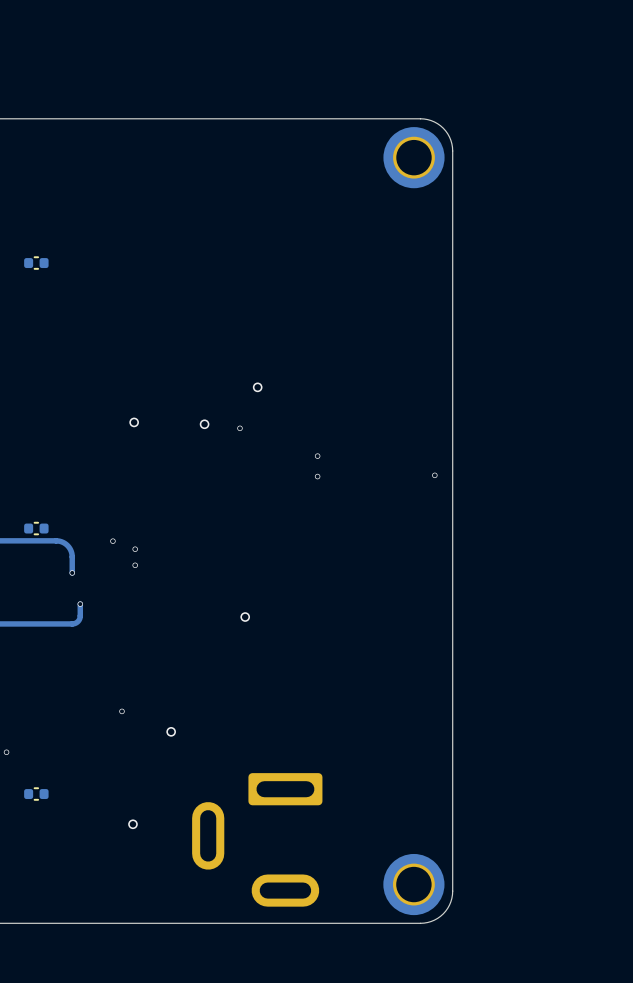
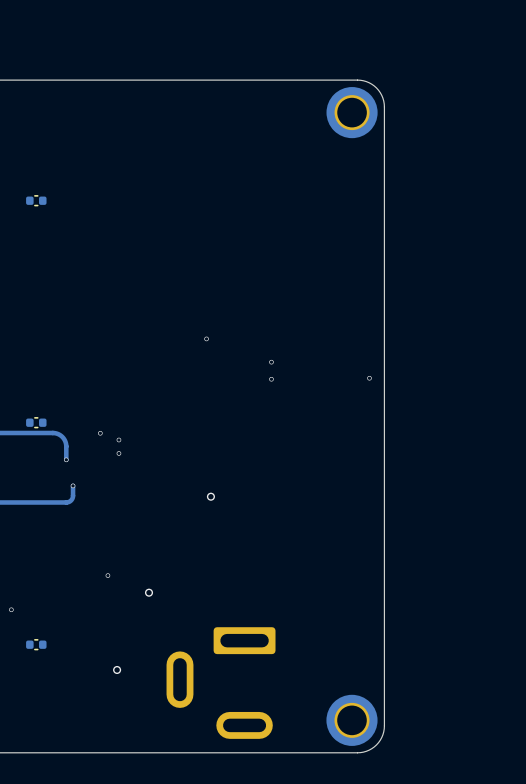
via: (257, 387) -> none
via: (134, 422) -> none
via: (204, 424) -> none

